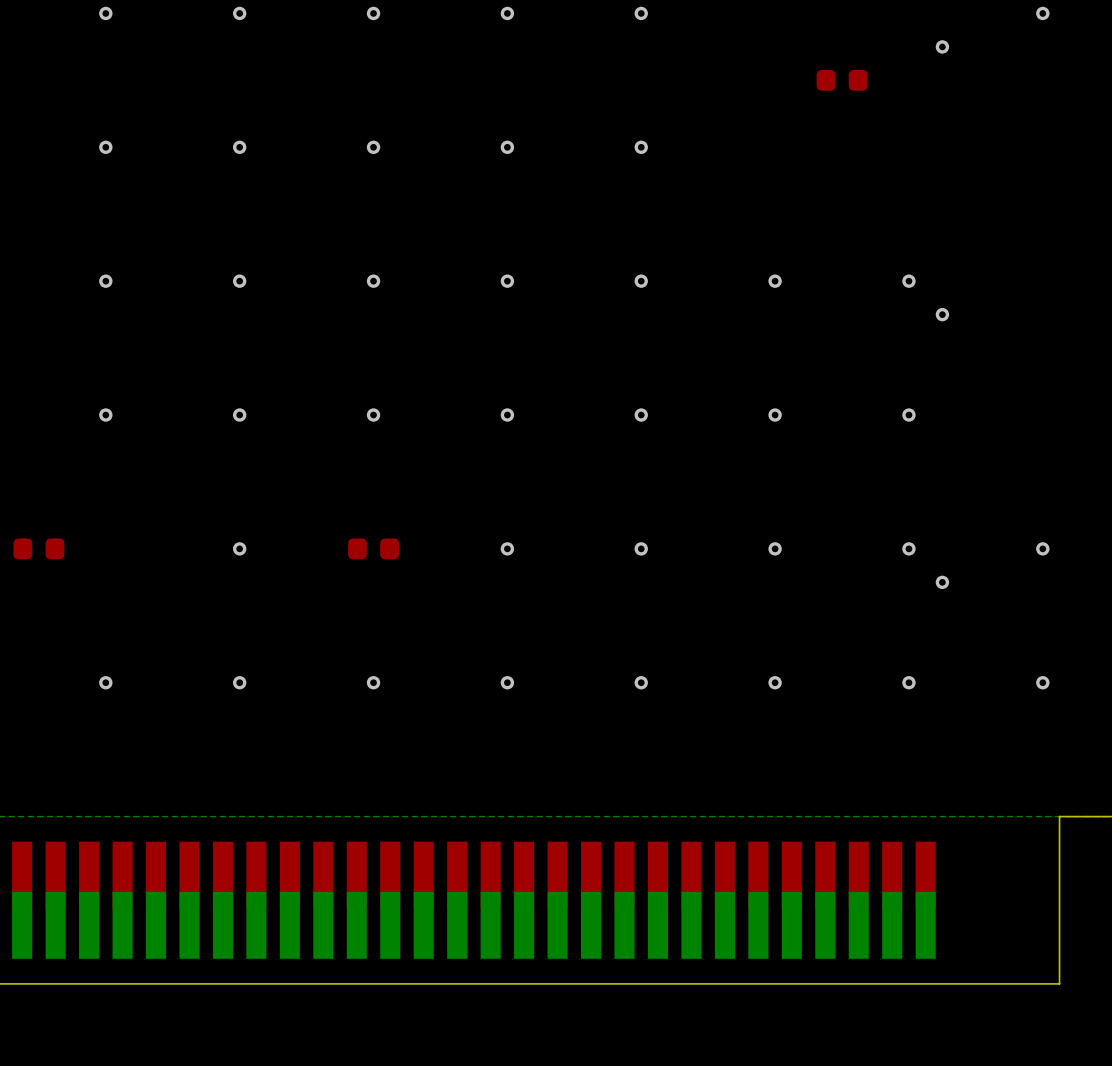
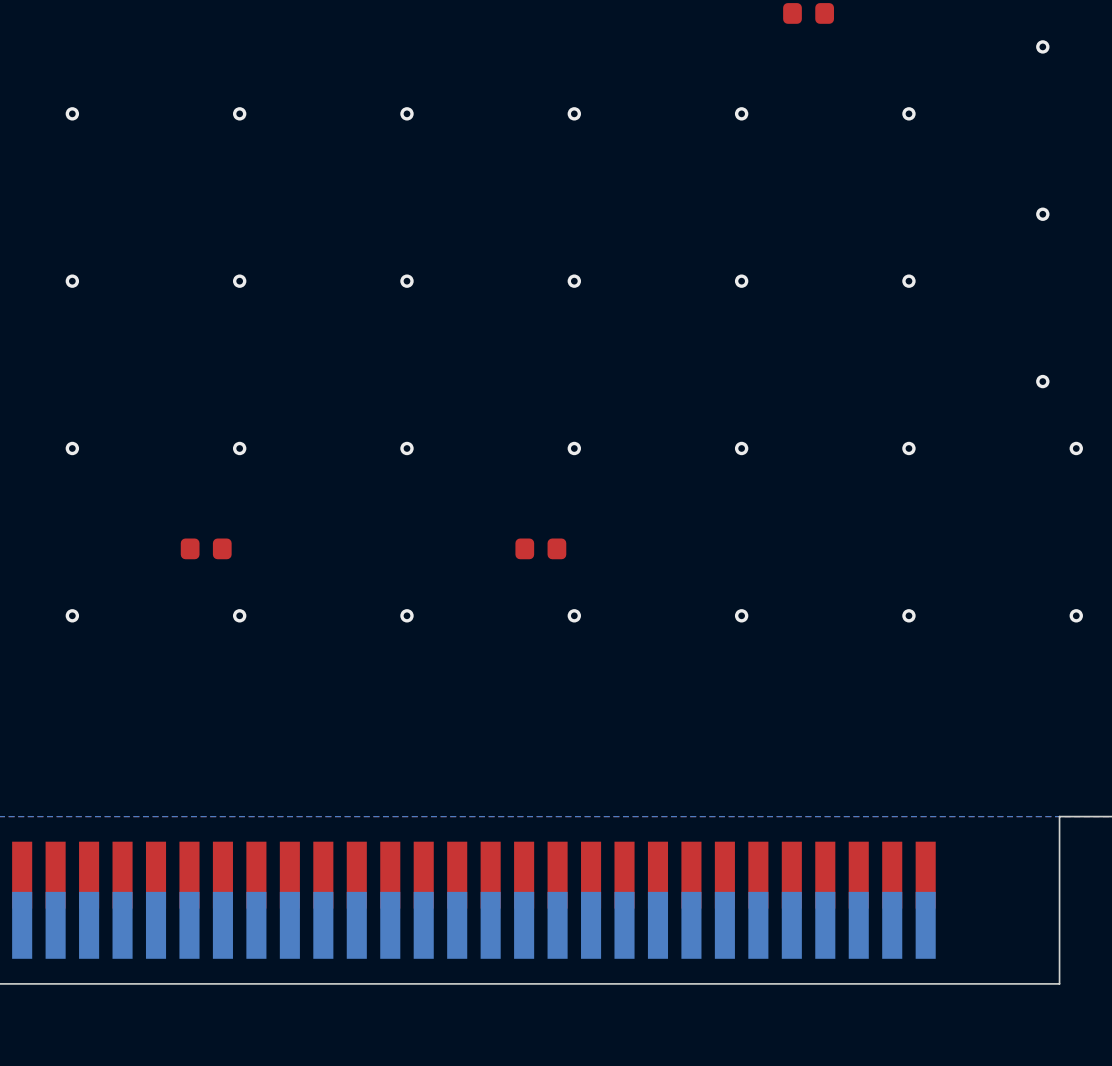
via: (105, 13) -> none
via: (239, 13) -> none
via: (373, 13) -> none
via: (507, 13) -> none
via: (641, 13) -> none
via position: (1042, 13) -> (1042, 46)
via: (942, 46) -> none
part position: (842, 80) -> (808, 13)
via: none -> (574, 113)
via: none -> (741, 113)
via: none -> (908, 113)
via position: (105, 147) -> (72, 113)
via position: (239, 147) -> (239, 113)
via position: (373, 147) -> (406, 113)
via: (507, 147) -> none
via: (641, 147) -> none
via: none -> (1042, 214)
via position: (105, 281) -> (72, 281)
via position: (373, 281) -> (406, 281)
via: (507, 281) -> none
via: none -> (574, 281)
via: (641, 281) -> none
via position: (775, 281) -> (741, 281)
via: (942, 314) -> none
via: none -> (1042, 381)
via position: (105, 415) -> (72, 448)
via position: (239, 415) -> (239, 448)
via position: (373, 415) -> (406, 448)
via: (507, 415) -> none
via: (641, 415) -> none
via position: (775, 415) -> (741, 448)
via position: (908, 415) -> (908, 448)
via: none -> (574, 448)
via: none -> (1076, 448)
part: (38, 548) -> none
part: none -> (206, 548)
via: (239, 548) -> none
part: (373, 548) -> none
via: (507, 548) -> none
part: none -> (540, 548)
via: (641, 548) -> none
via: (775, 548) -> none
via: (908, 548) -> none
via: (1042, 548) -> none
via: (942, 582) -> none
via: none -> (72, 615)
via: none -> (239, 615)
via: none -> (406, 615)
via: none -> (574, 615)
via: none -> (741, 615)
via: none -> (908, 615)
via: none -> (1076, 615)
via: (105, 682) -> none
via: (239, 682) -> none
via: (373, 682) -> none
via: (507, 682) -> none
via: (641, 682) -> none
via: (775, 682) -> none
via: (908, 682) -> none
via: (1042, 682) -> none

